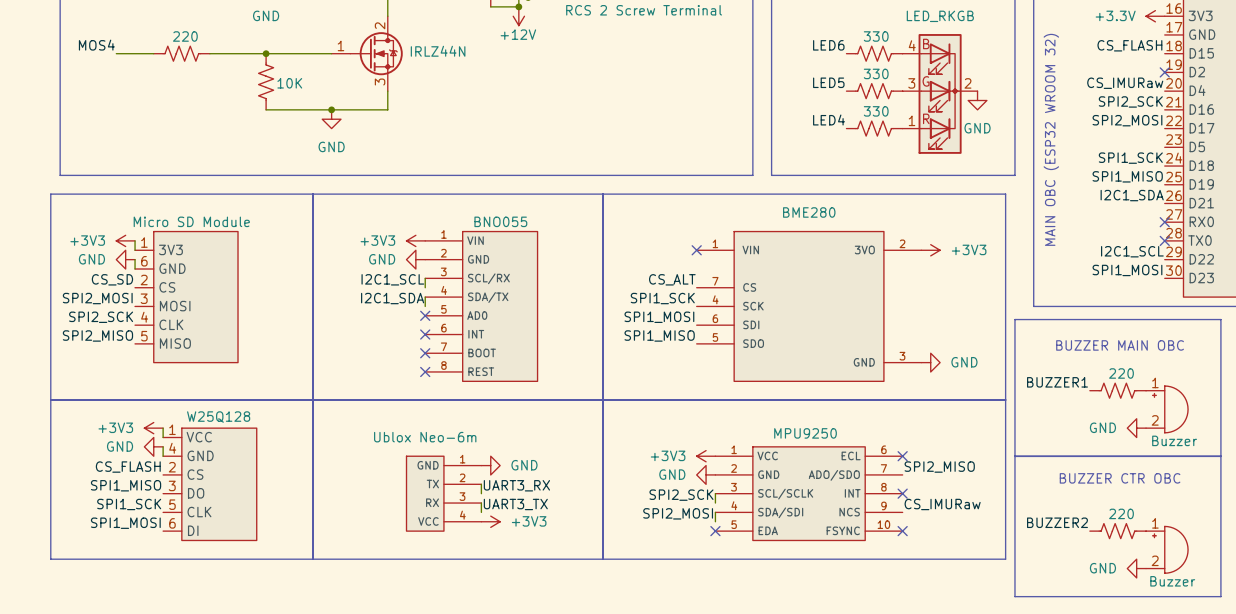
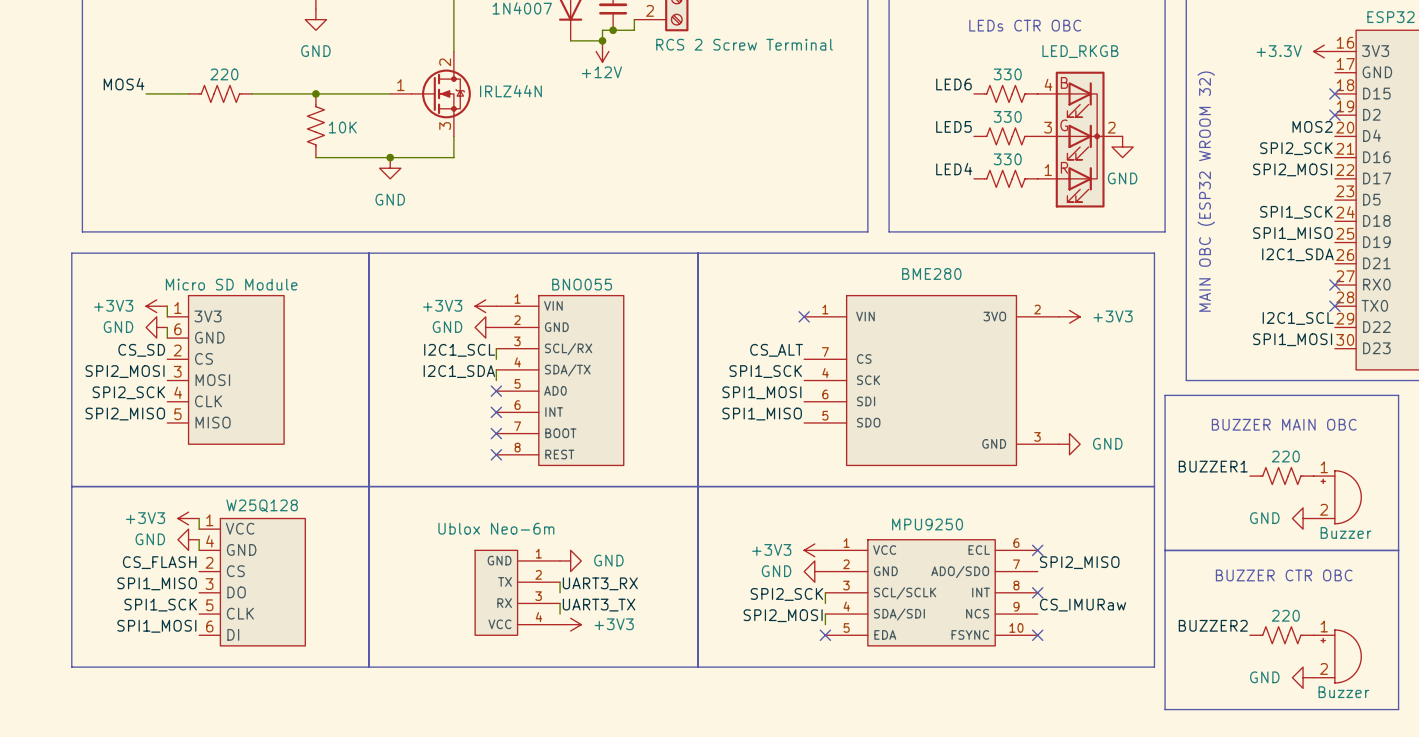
label: CS_FLASH (1129, 45) -> none
no-connect mark: none -> (1334, 93)
label: CS_IMURaw (1125, 83) -> MOS2 (1312, 126)

